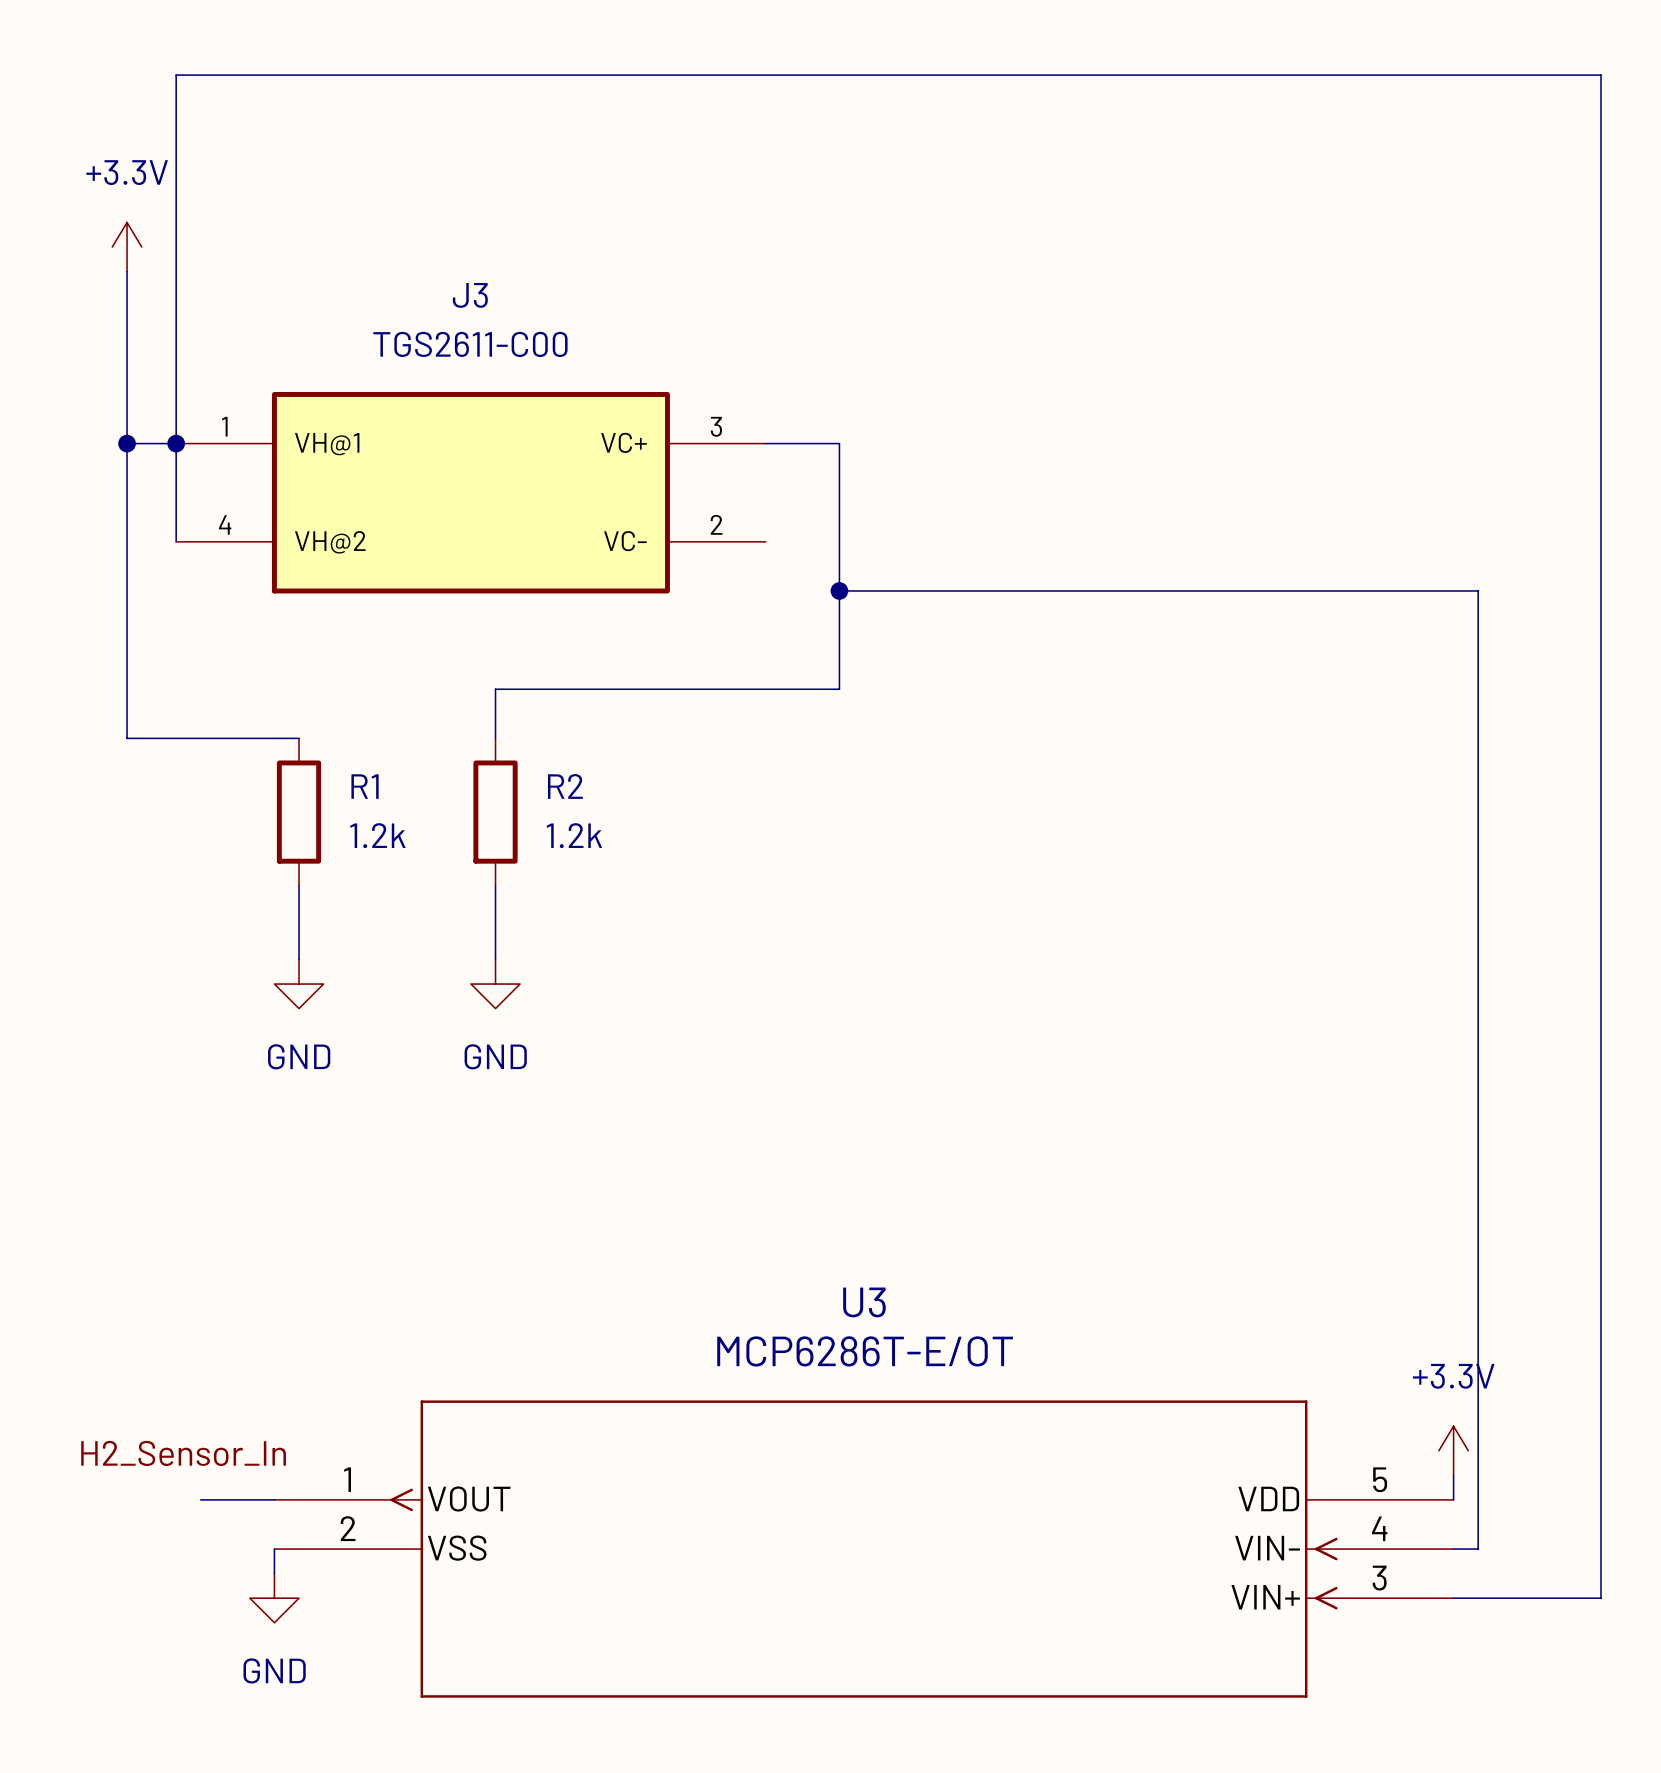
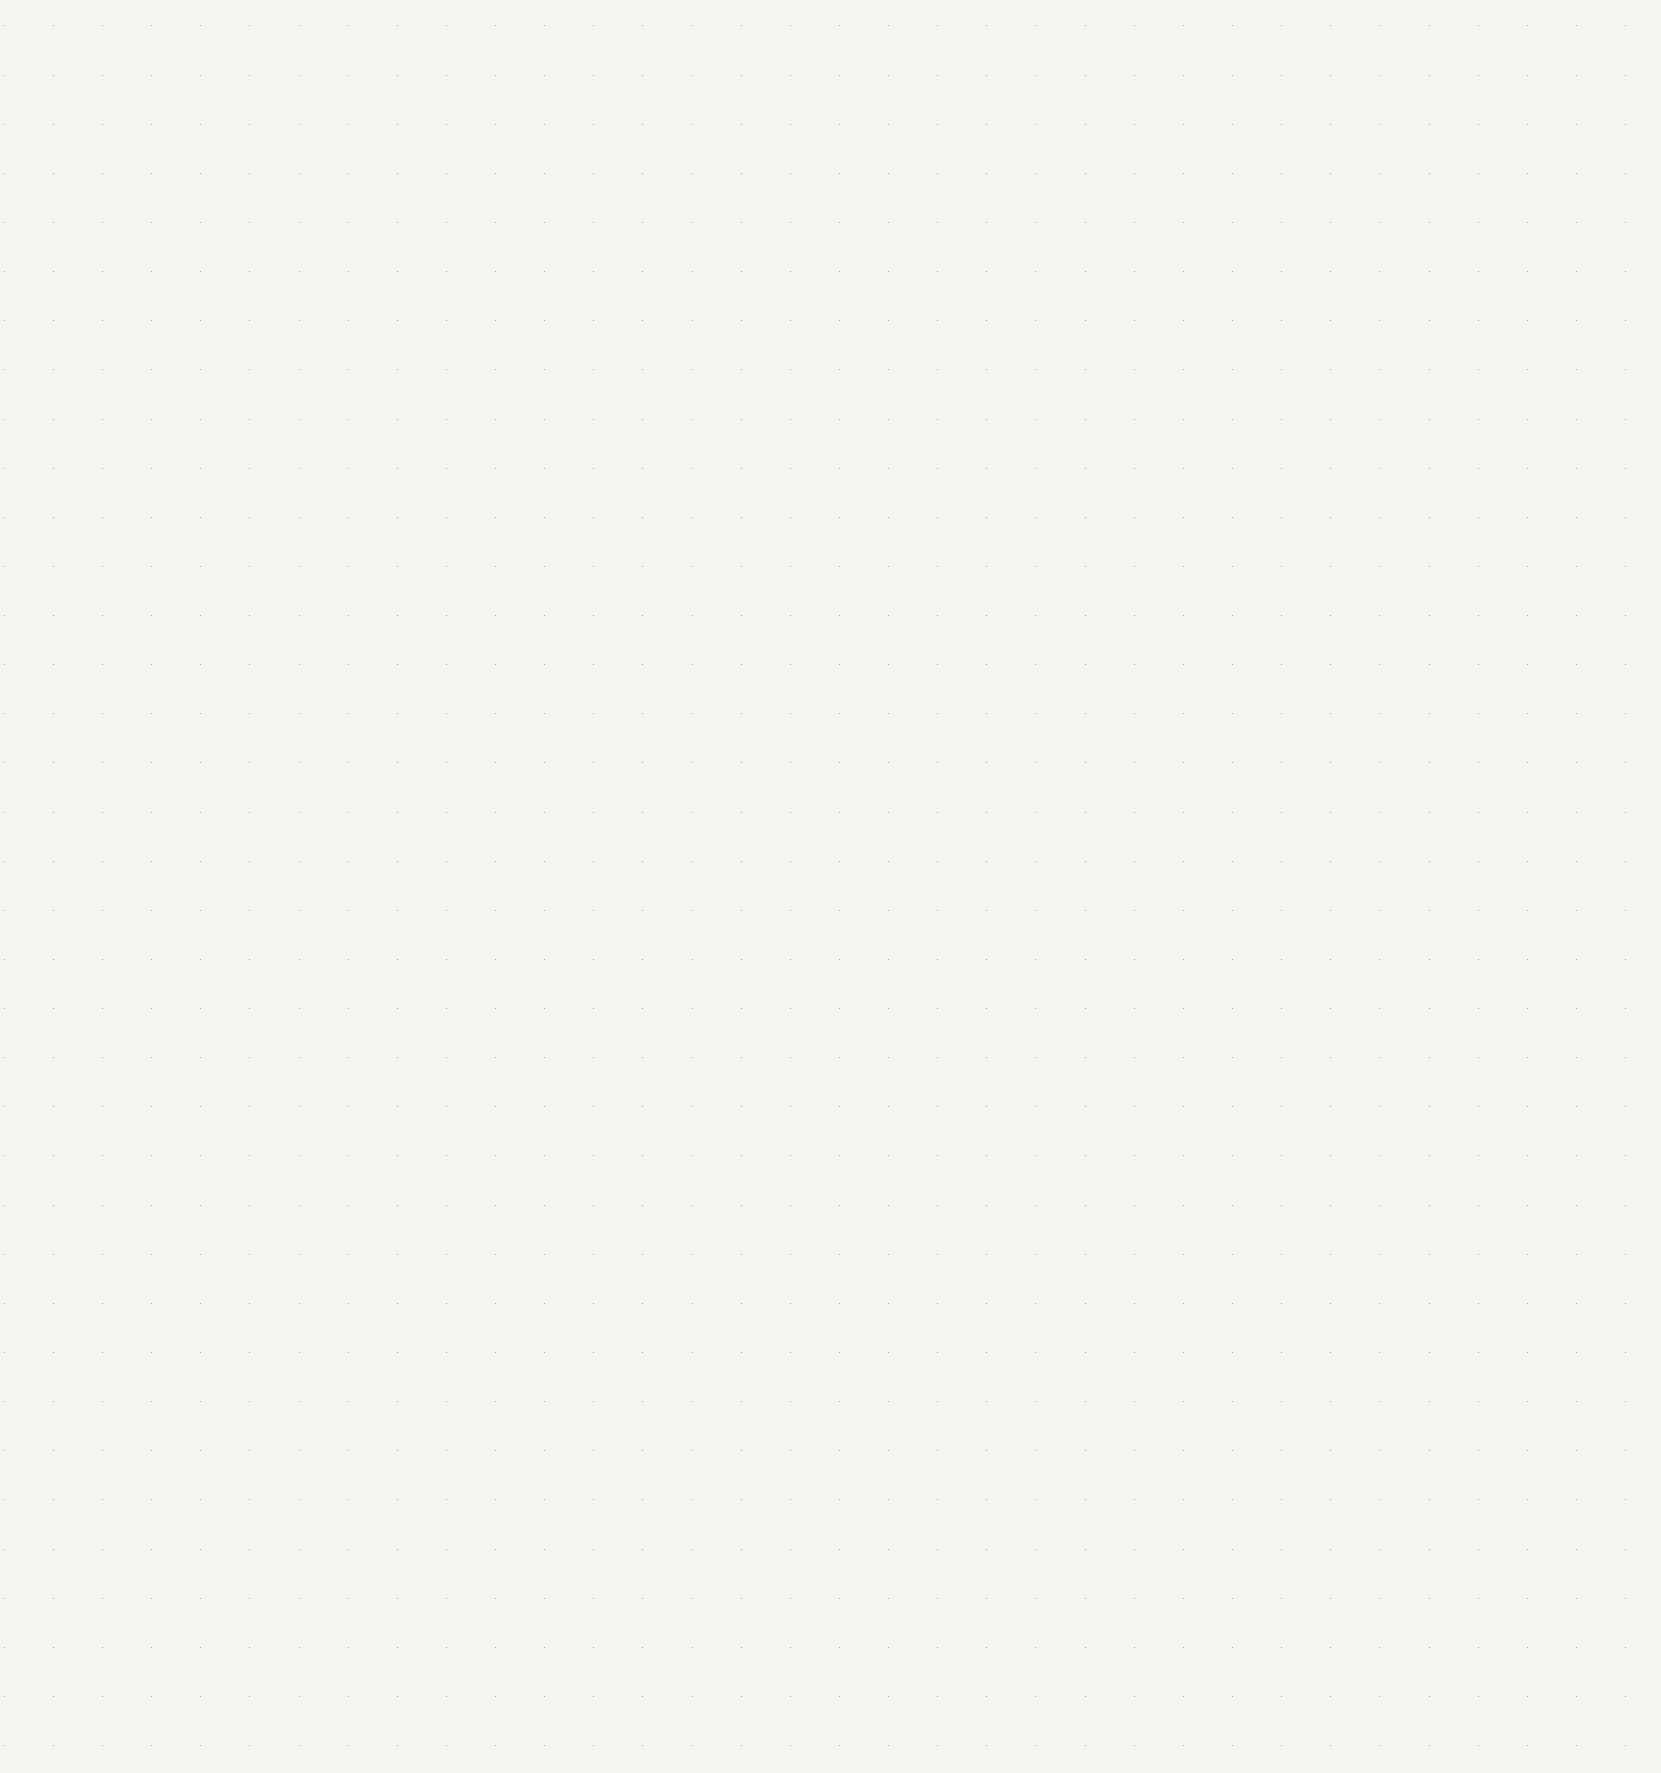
power symbol: +3.3V (127, 247) -> none
wire: (127, 271) (127, 738) (299, 738) -> none
wire: (127, 443) (176, 443) -> none
junction: (127, 443) -> none
junction: (176, 443) -> none
wire: (765, 443) (839, 443) (839, 689) (495, 689) (495, 738) -> none
J3: TGS2611-C00 (470, 492) -> none
wire: (176, 541) (176, 75) (1600, 75) (1600, 1598) (1453, 1598) -> none
wire: (839, 590) (1478, 590) (1478, 1549) (1453, 1549) -> none
junction: (839, 590) -> none
R1: 1.2k (299, 812) -> none
R2: 1.2k (495, 812) -> none
wire: (299, 885) (299, 959) -> none
wire: (495, 885) (495, 959) -> none
power symbol: GND (299, 984) -> none
power symbol: GND (495, 984) -> none
power symbol: +3.3V (1453, 1450) -> none
label: H2_Sensor_In (183, 1453) -> none
wire: (1453, 1475) (1453, 1499) -> none
wire: (200, 1499) (274, 1499) -> none
wire: (274, 1549) (274, 1573) -> none
U3: MCP6286T-E/OT (864, 1549) -> none
power symbol: GND (274, 1598) -> none

